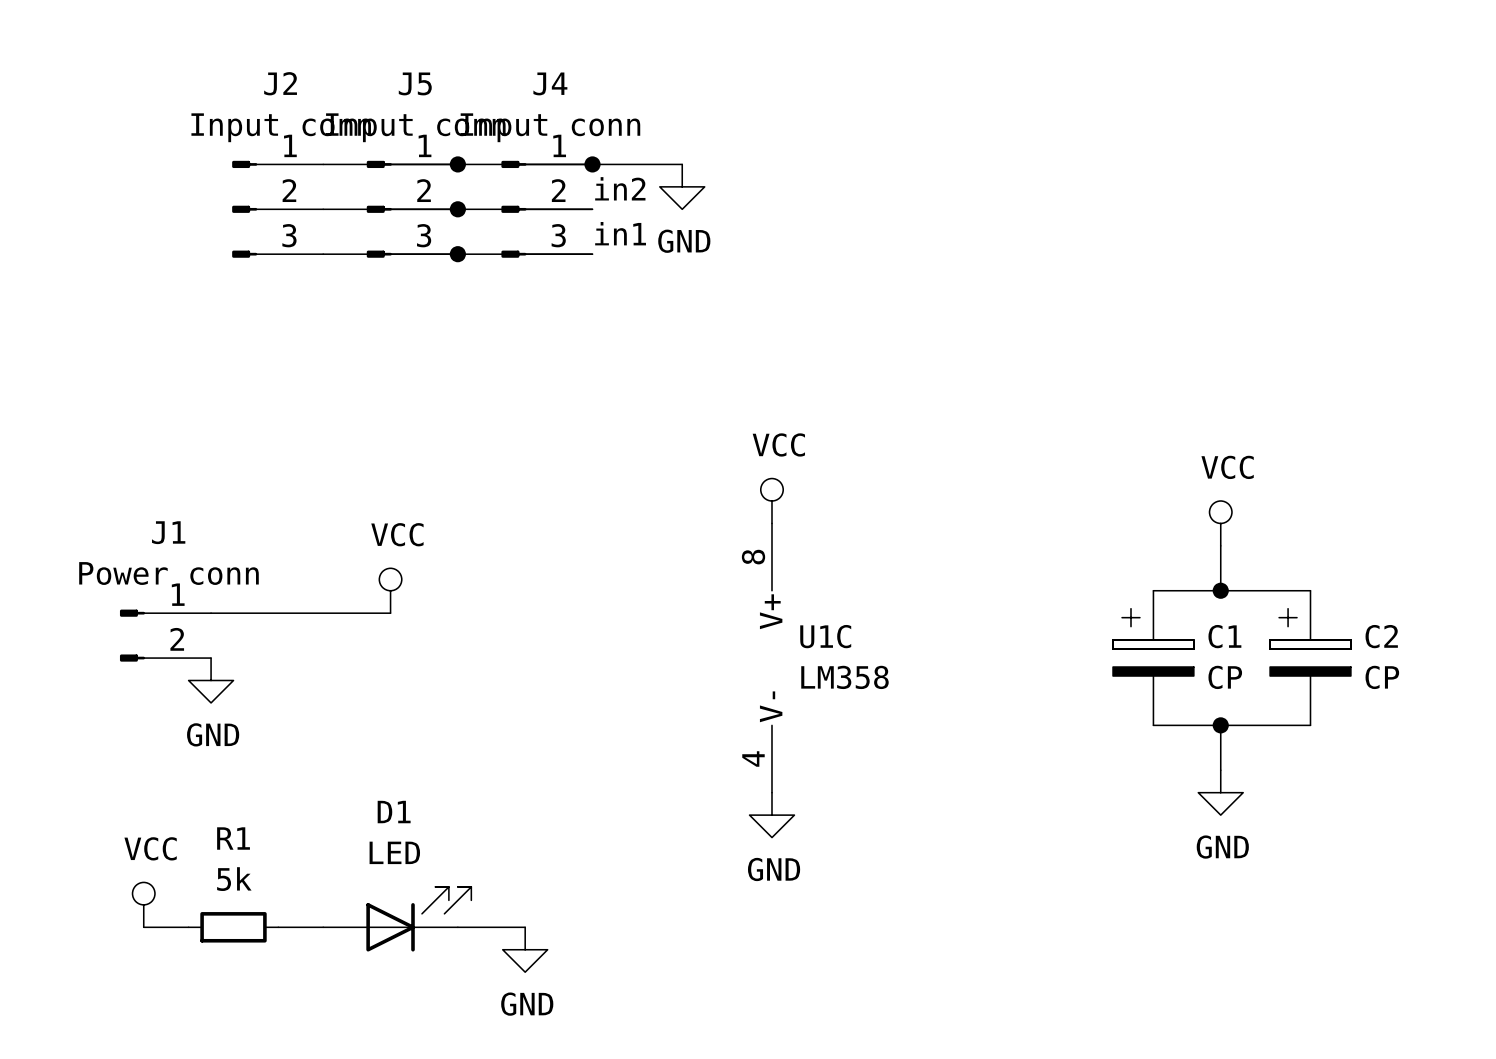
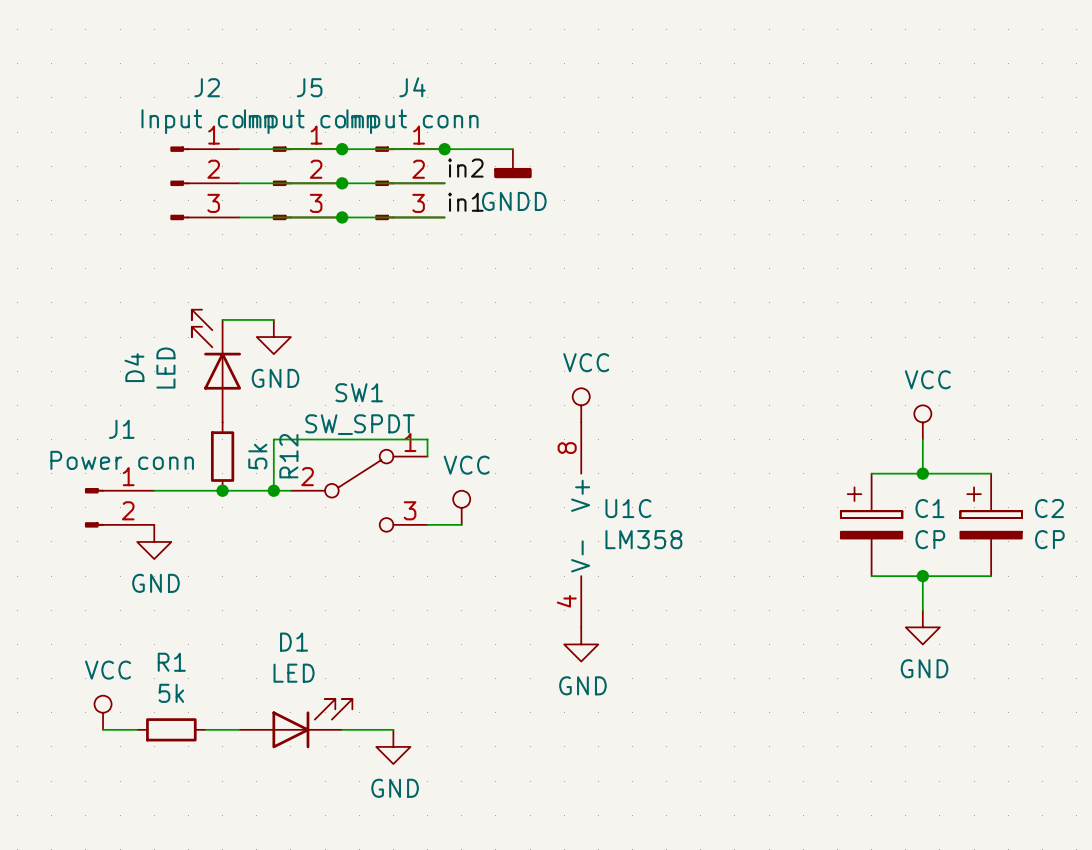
power symbol: GND (682, 186) -> GNDD (512, 163)
wire: none -> (222, 319) (273, 319)
power symbol: none -> GND (273, 337)
D4: none -> LED (216, 366)
R12: none -> 5k (222, 456)
wire: none -> (427, 456) (427, 439) (273, 439) (273, 490)
power symbol position: VCC (390, 590) -> VCC (461, 507)
junction: none -> (222, 490)
junction: none -> (273, 490)
SW1: none -> SW_SPDT (359, 490)
wire: none -> (427, 524) (461, 524)

